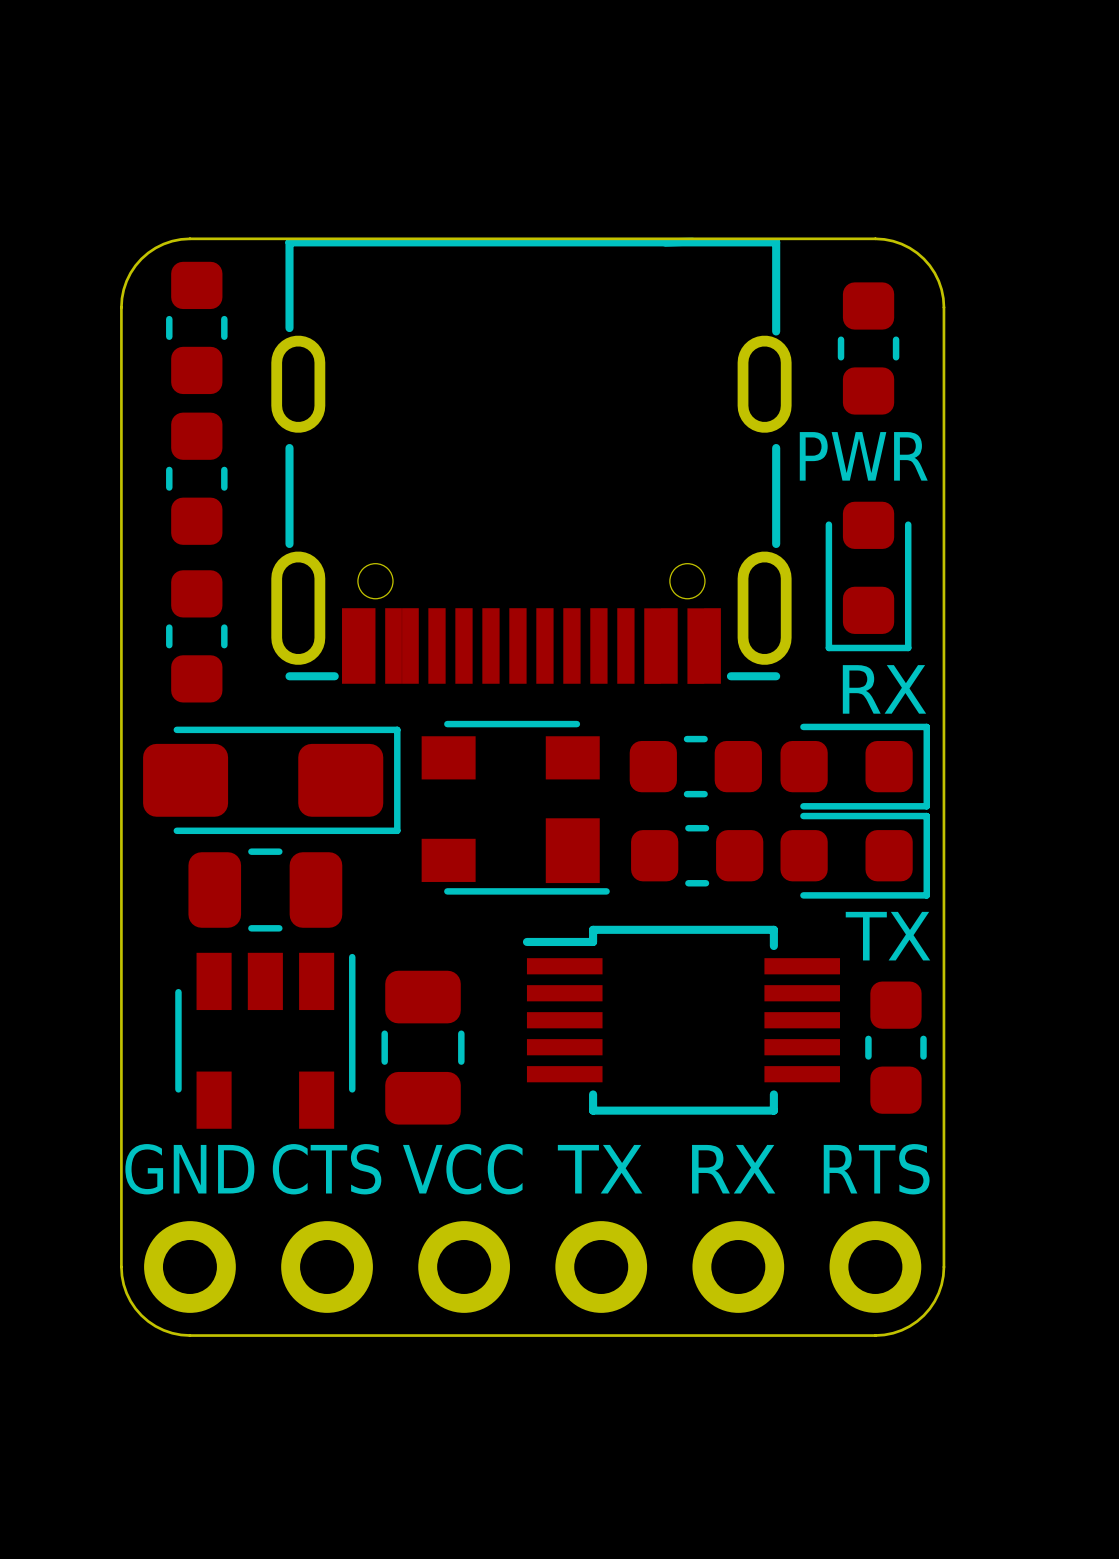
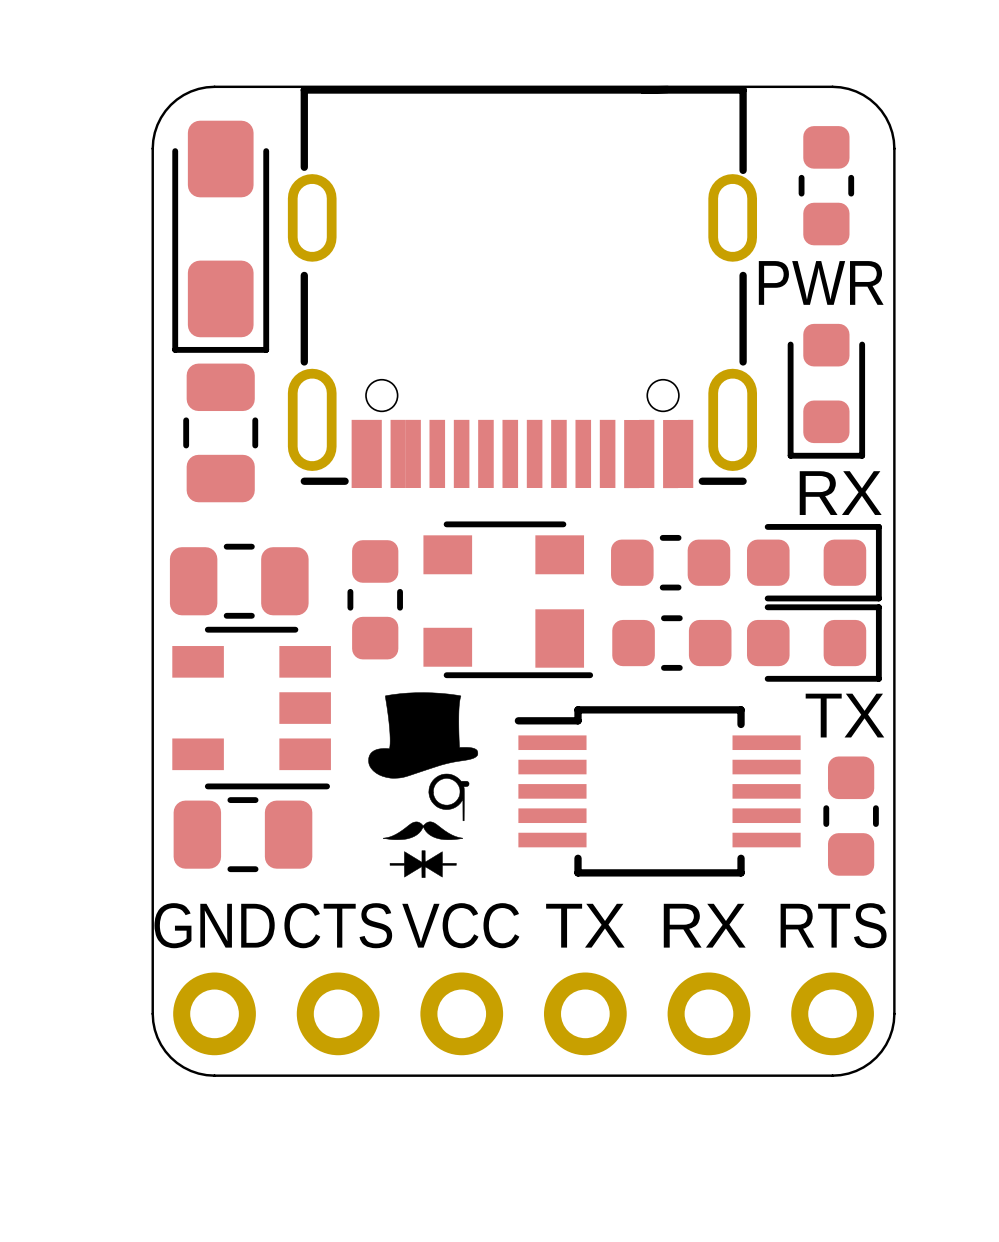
part: (196, 327) -> none
part: (196, 478) -> none
part footprint: [166, 570, 228, 703] -> [183, 363, 259, 503]
part rotation: 0° (271, 780) -> 90° clockwise (220, 236)
part position: (271, 780) -> (220, 236)
part: none -> (375, 599)
part footprint: [188, 848, 343, 932] -> [172, 626, 331, 790]
drawing: none -> [368, 692, 479, 878]
part footprint: [175, 952, 356, 1129] -> [173, 797, 313, 873]
part rotation: 0° (423, 1047) -> 90° clockwise (239, 581)
part position: (423, 1047) -> (239, 581)

